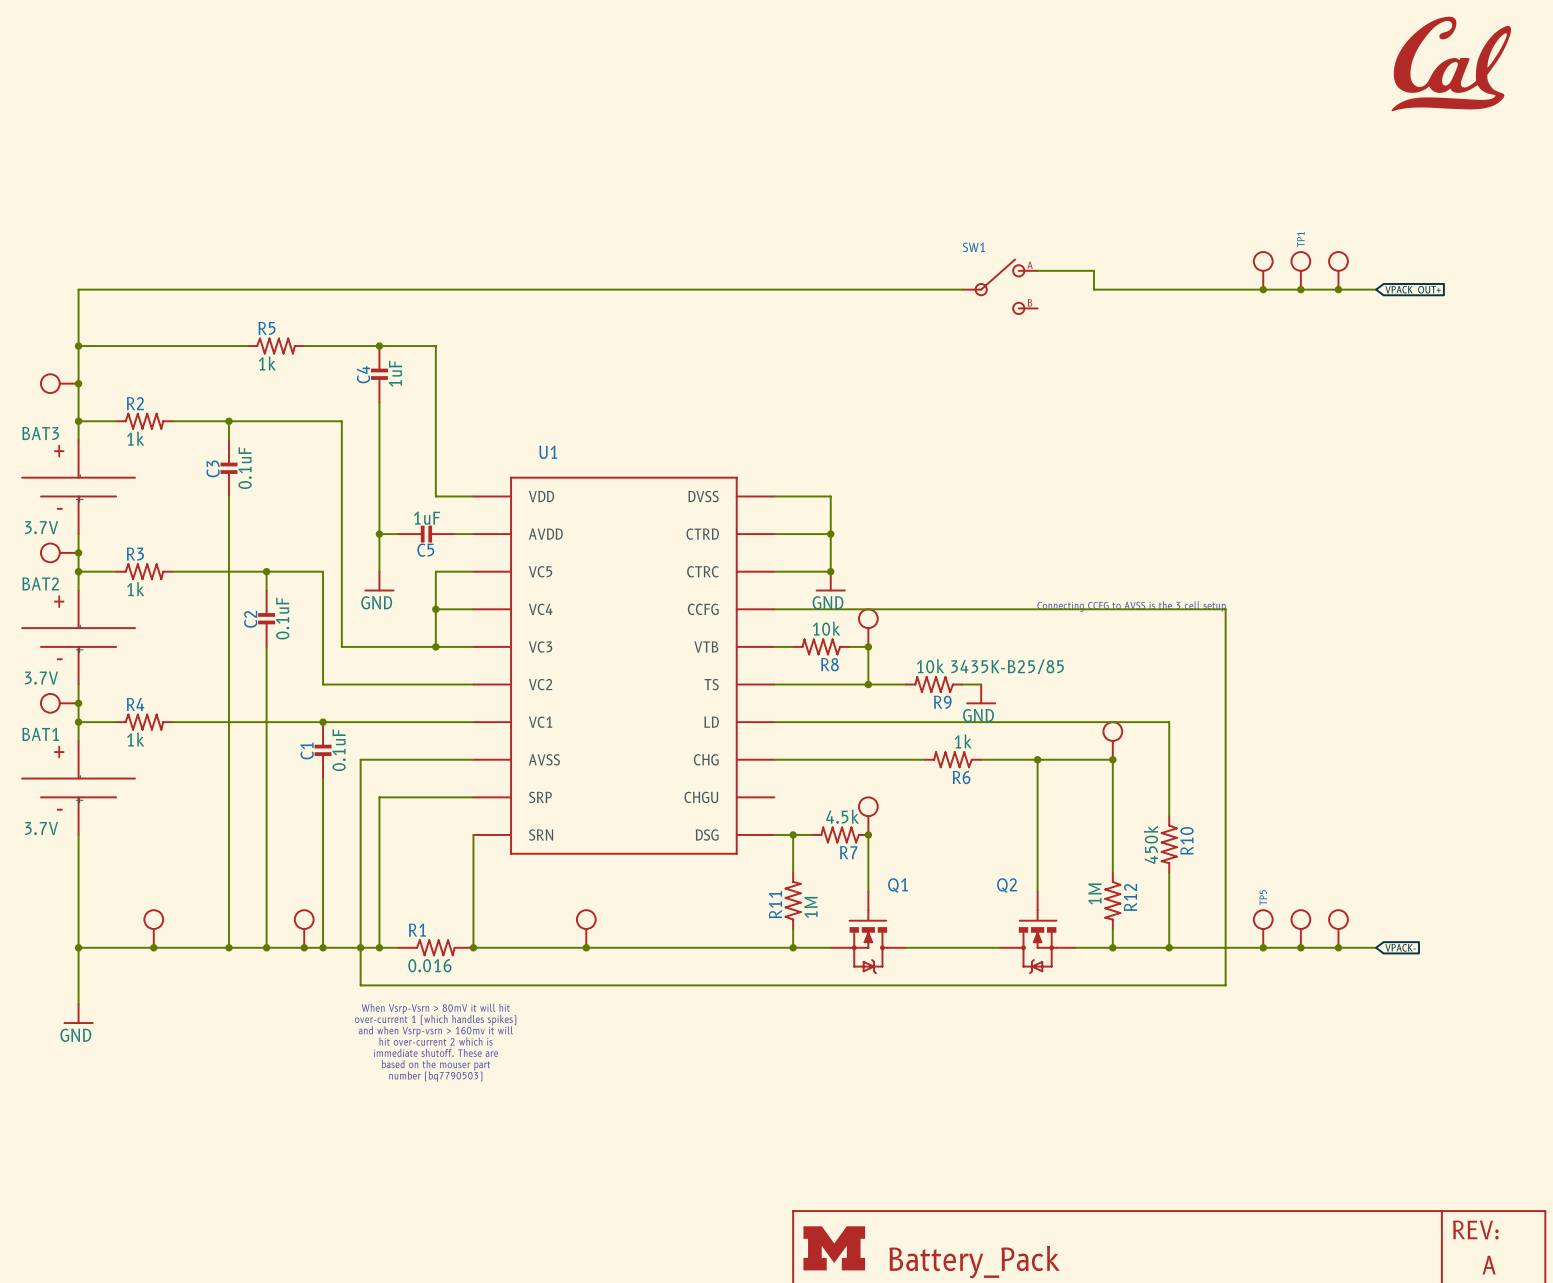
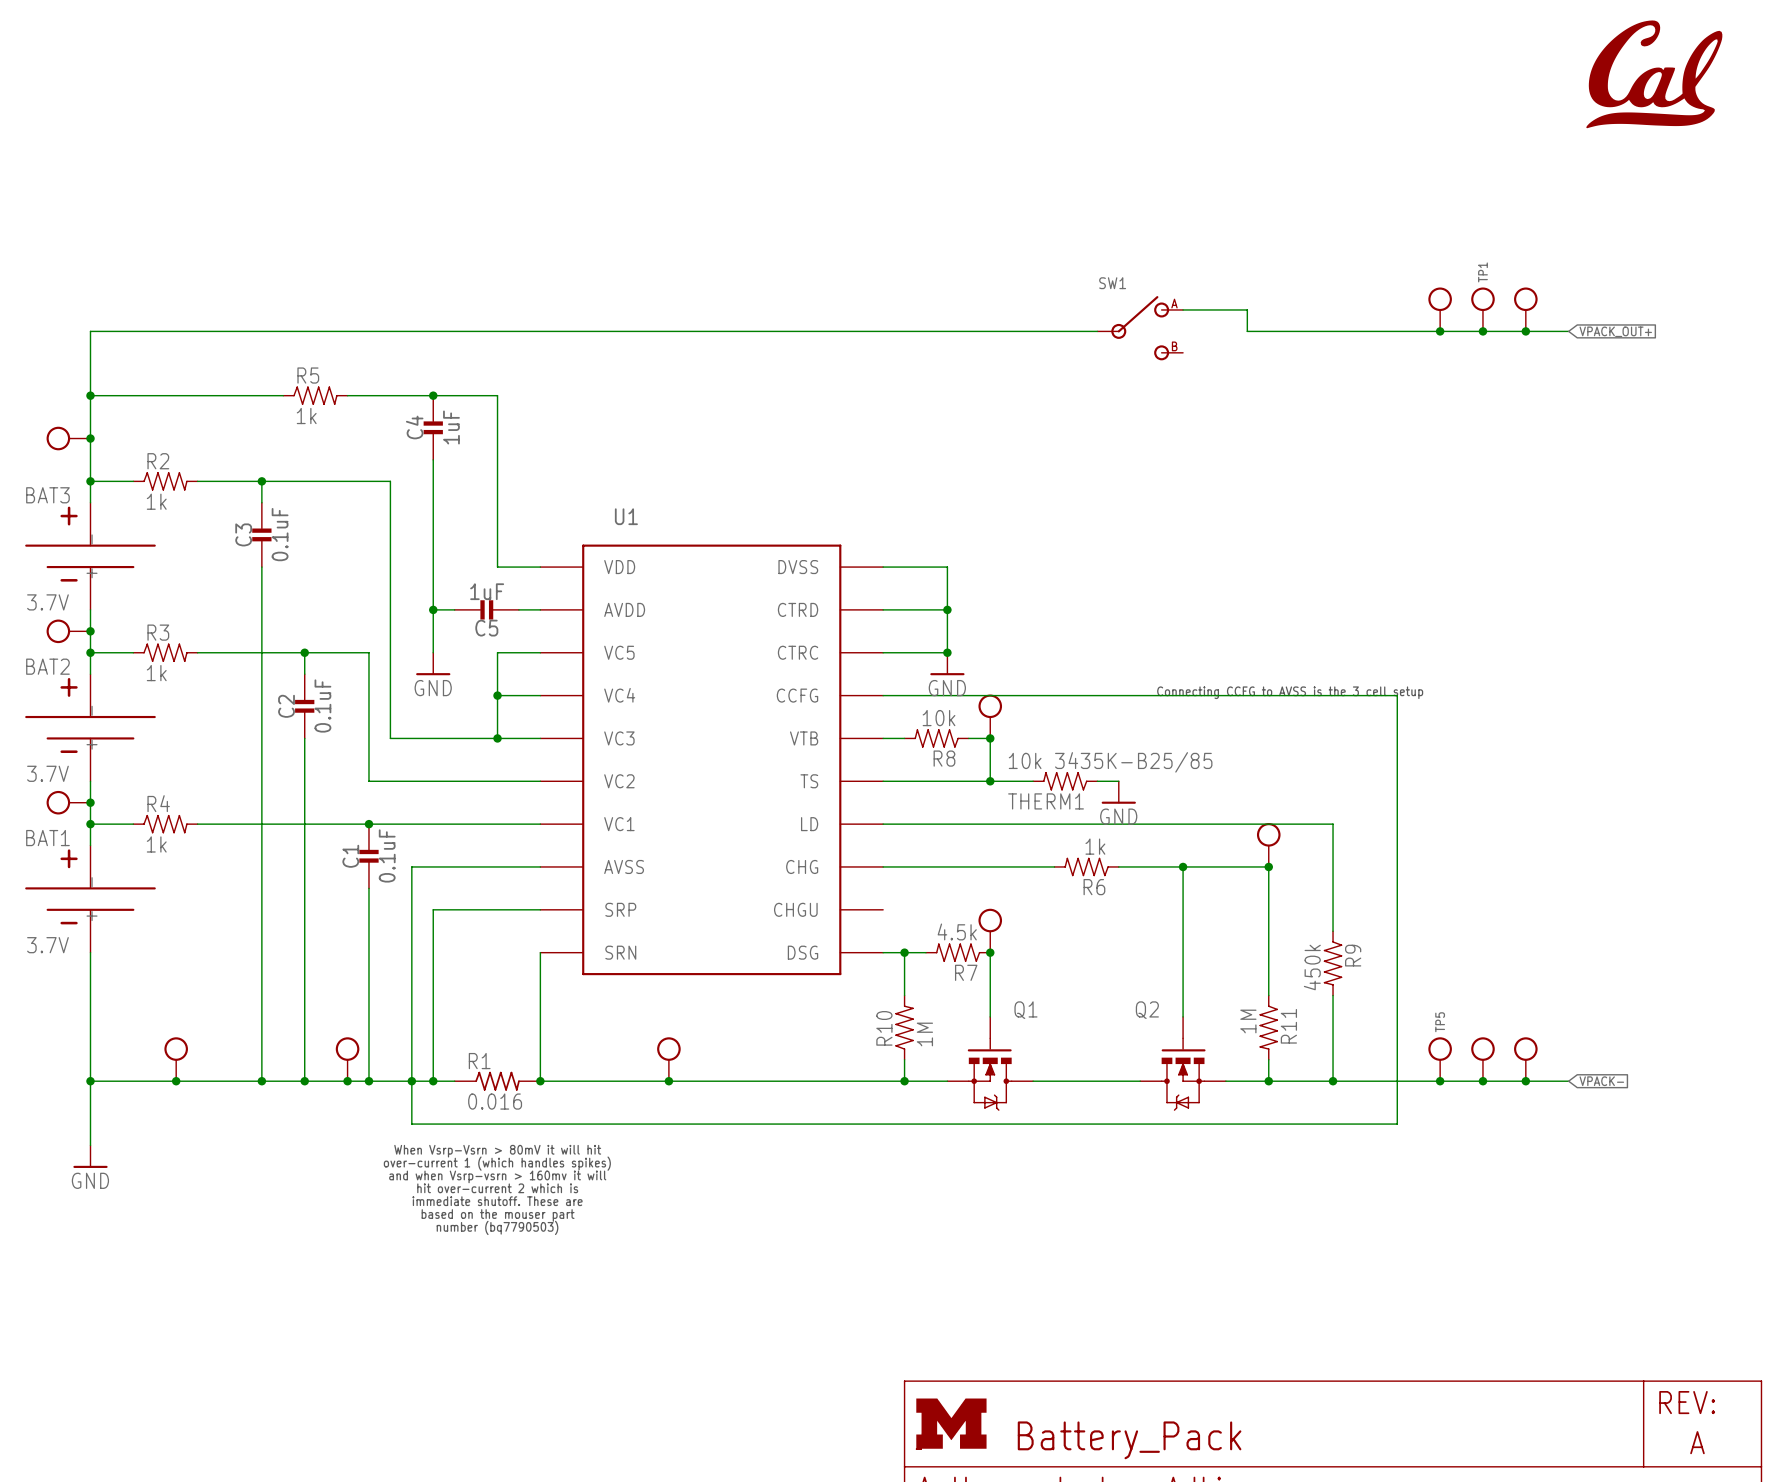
R9 name: R9 (942, 702) -> THERM1 (1046, 801)
R10 name: R10 (1186, 840) -> R9 (1353, 955)
R12 name: R12 (1130, 897) -> R11 (1288, 1026)
R11 name: R11 (775, 904) -> R10 (884, 1028)

